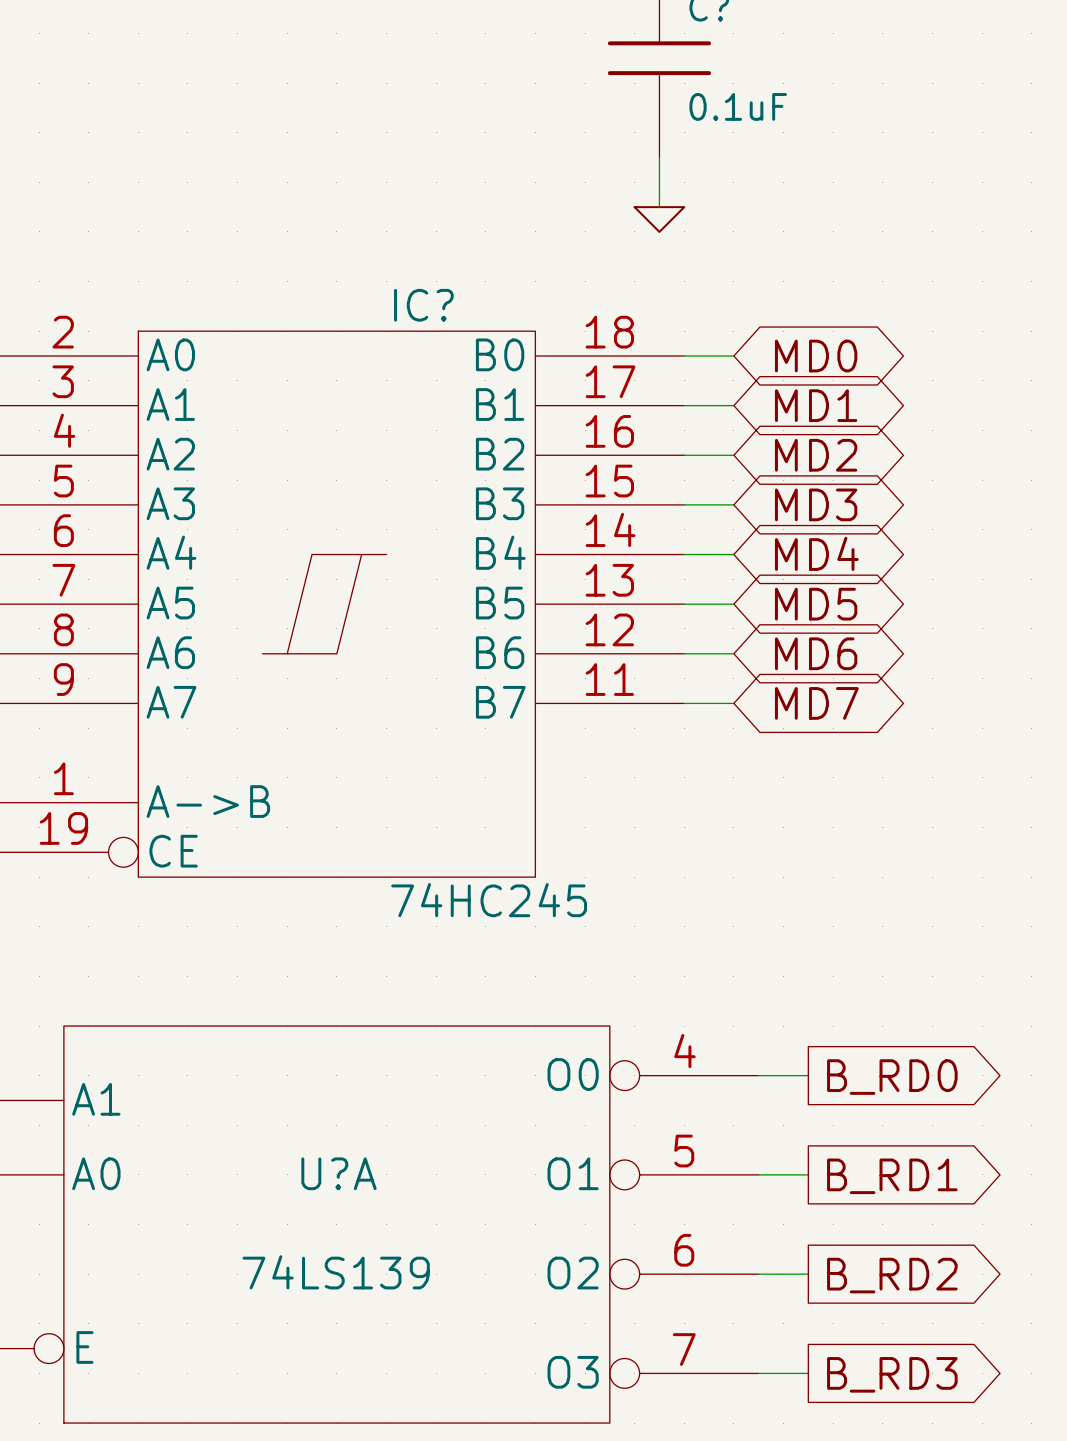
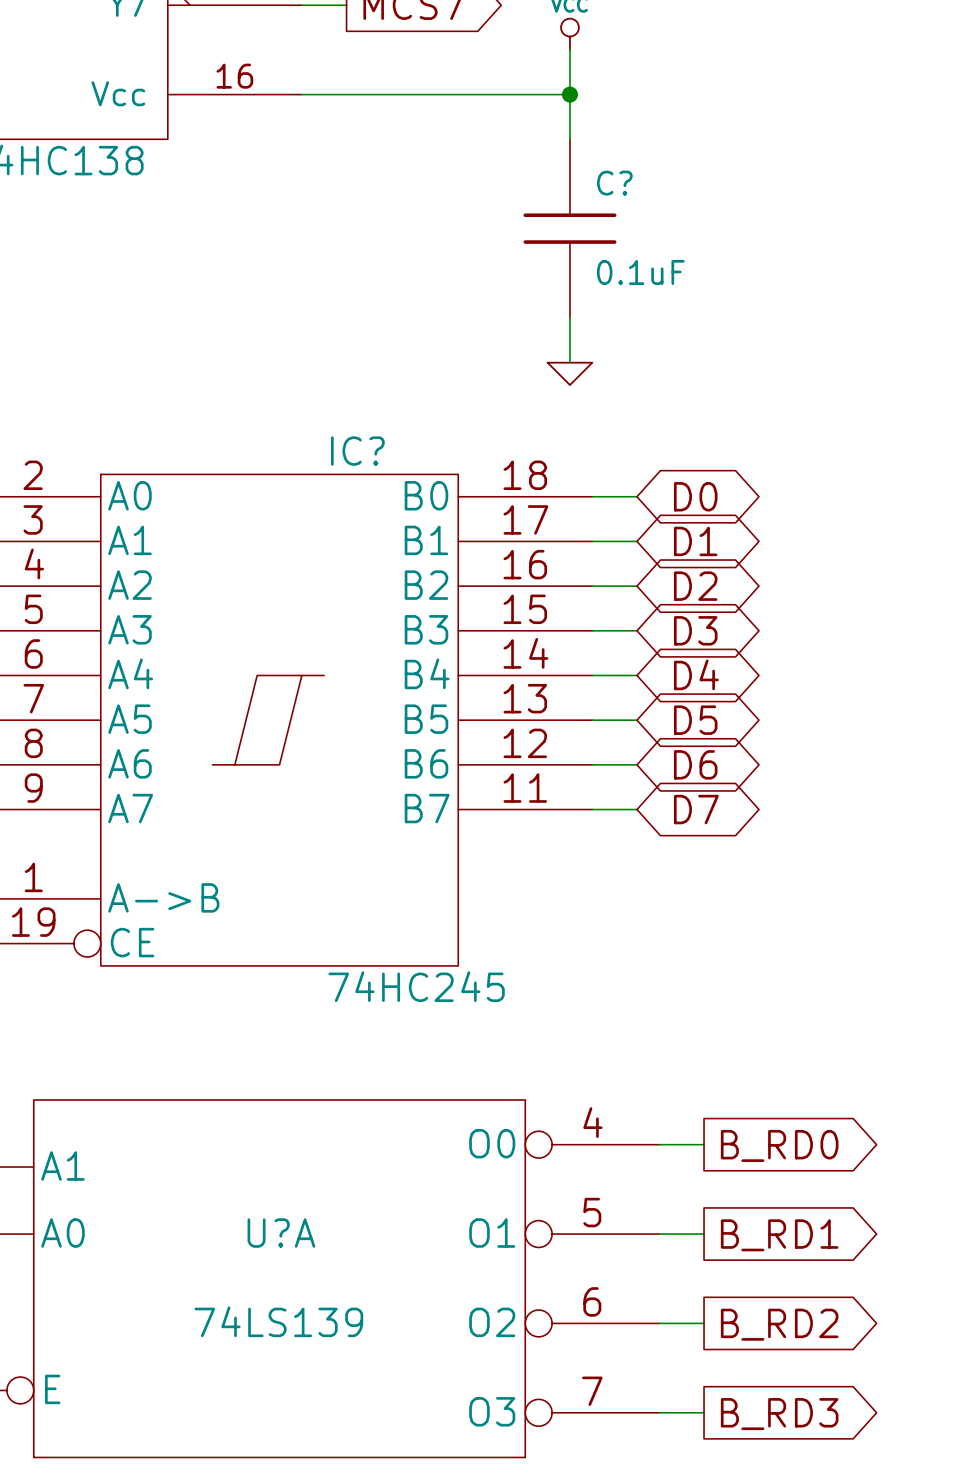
global label: MD0 (816, 356) -> D0 (695, 496)
global label: MD1 (816, 405) -> D1 (695, 541)
global label: MD2 (816, 455) -> D2 (695, 586)
global label: MD3 (816, 504) -> D3 (695, 630)
global label: MD4 (816, 553) -> D4 (696, 674)
global label: MD5 (816, 604) -> D5 (695, 720)
global label: MD6 (816, 653) -> D6 (695, 764)
global label: MD7 (816, 703) -> D7 (696, 809)

